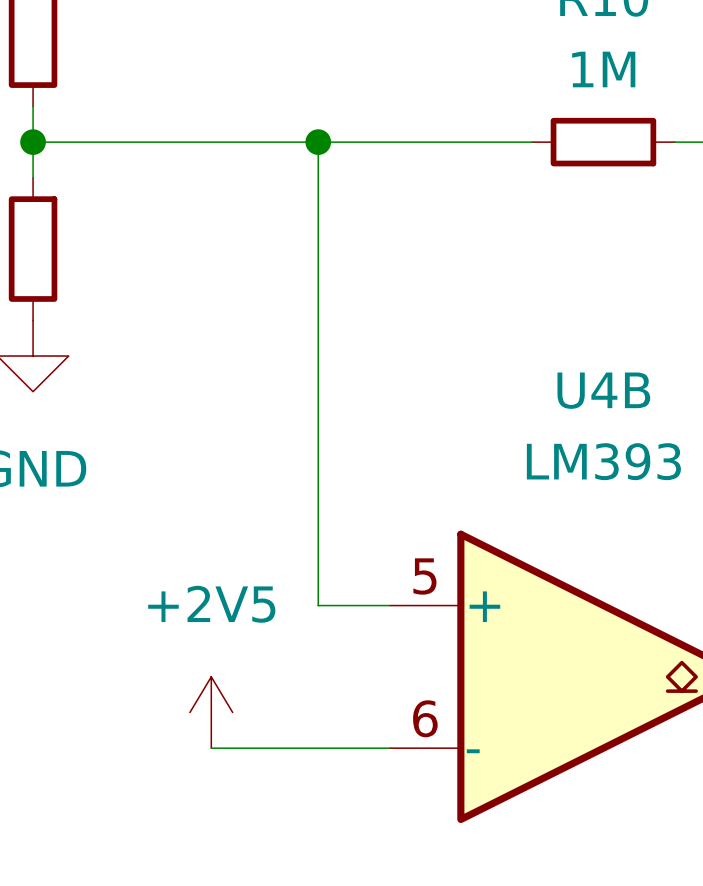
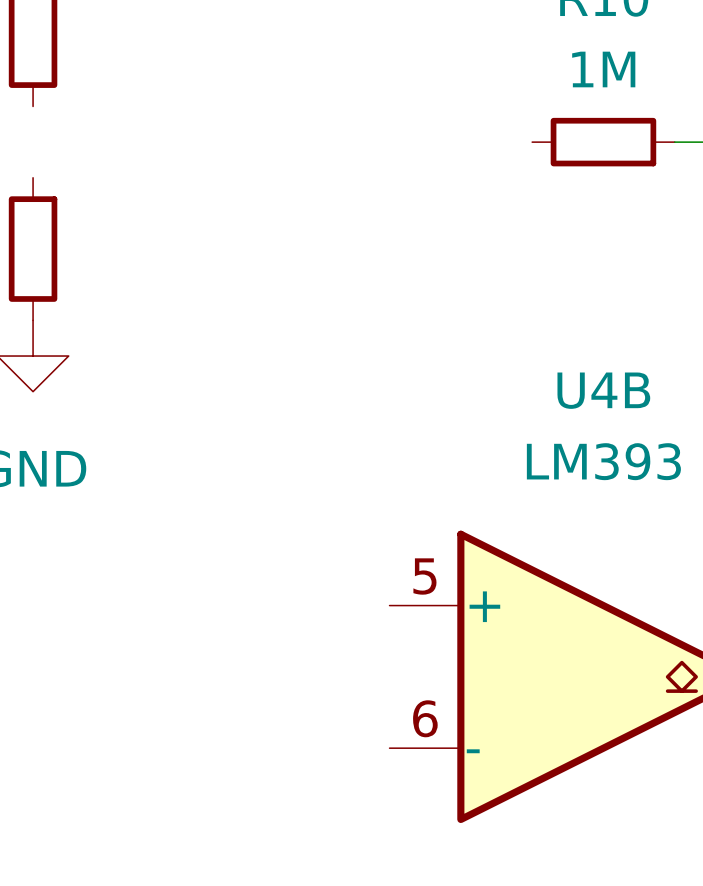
wire: (33, 106) (33, 177) -> none
wire: (33, 142) (532, 142) -> none
junction: (33, 142) -> none
wire: (318, 142) (318, 605) (389, 605) -> none
junction: (318, 142) -> none
power symbol: +2V5 (211, 712) -> none
wire: (211, 748) (389, 748) -> none

